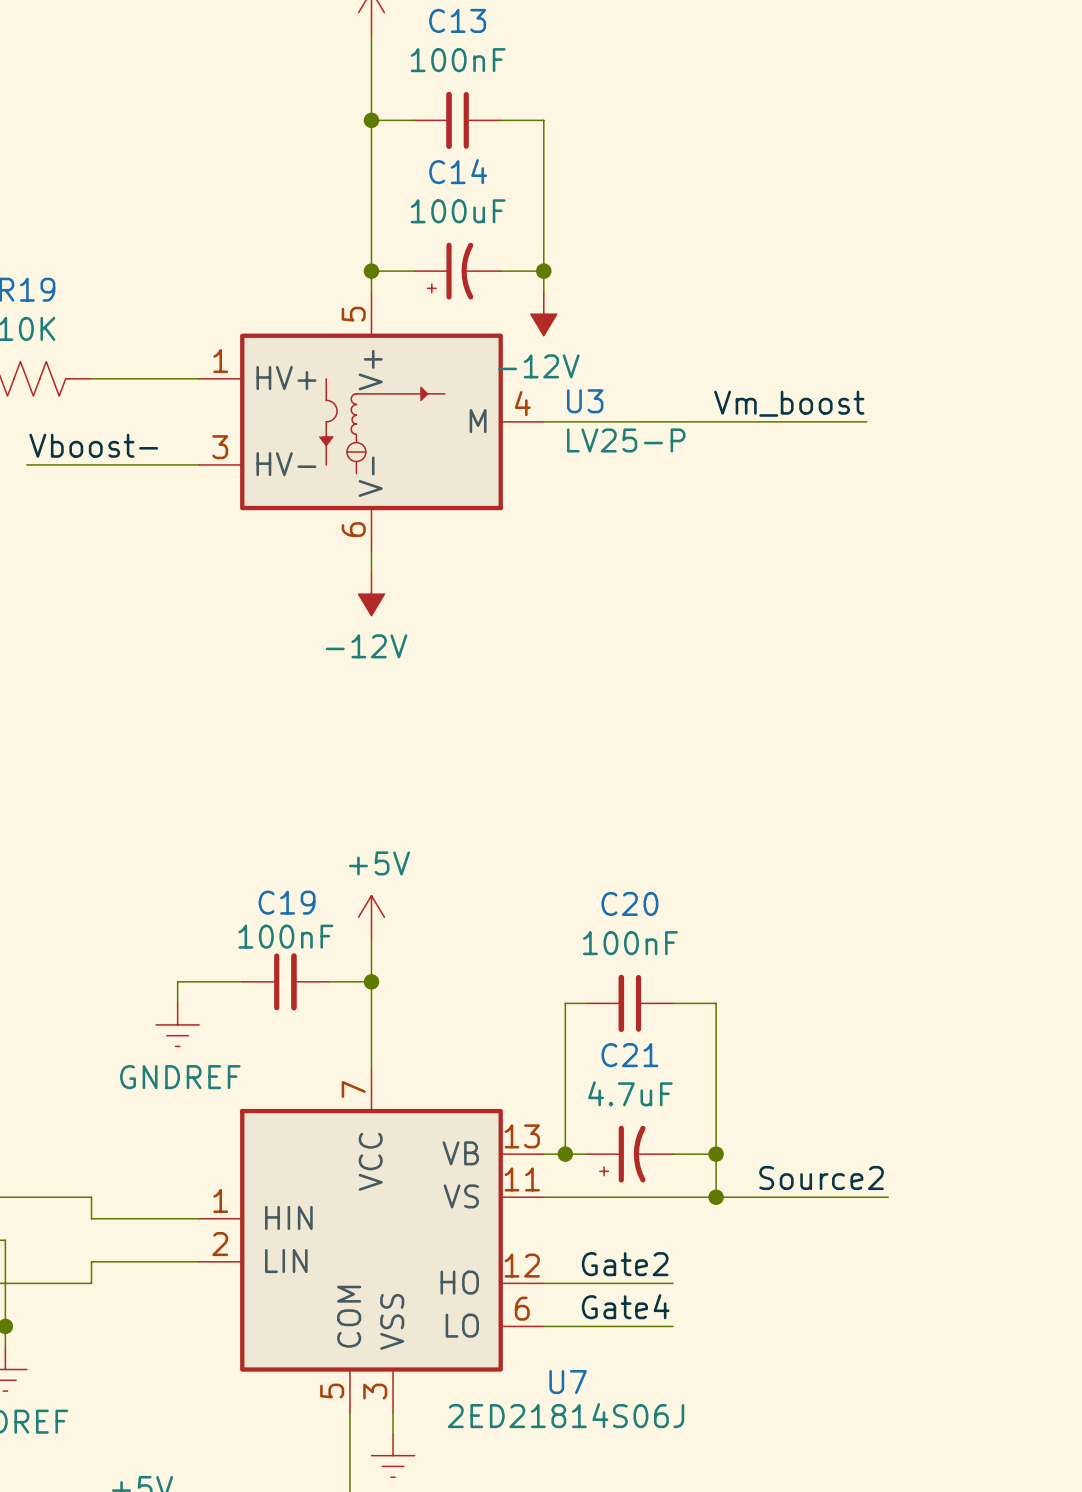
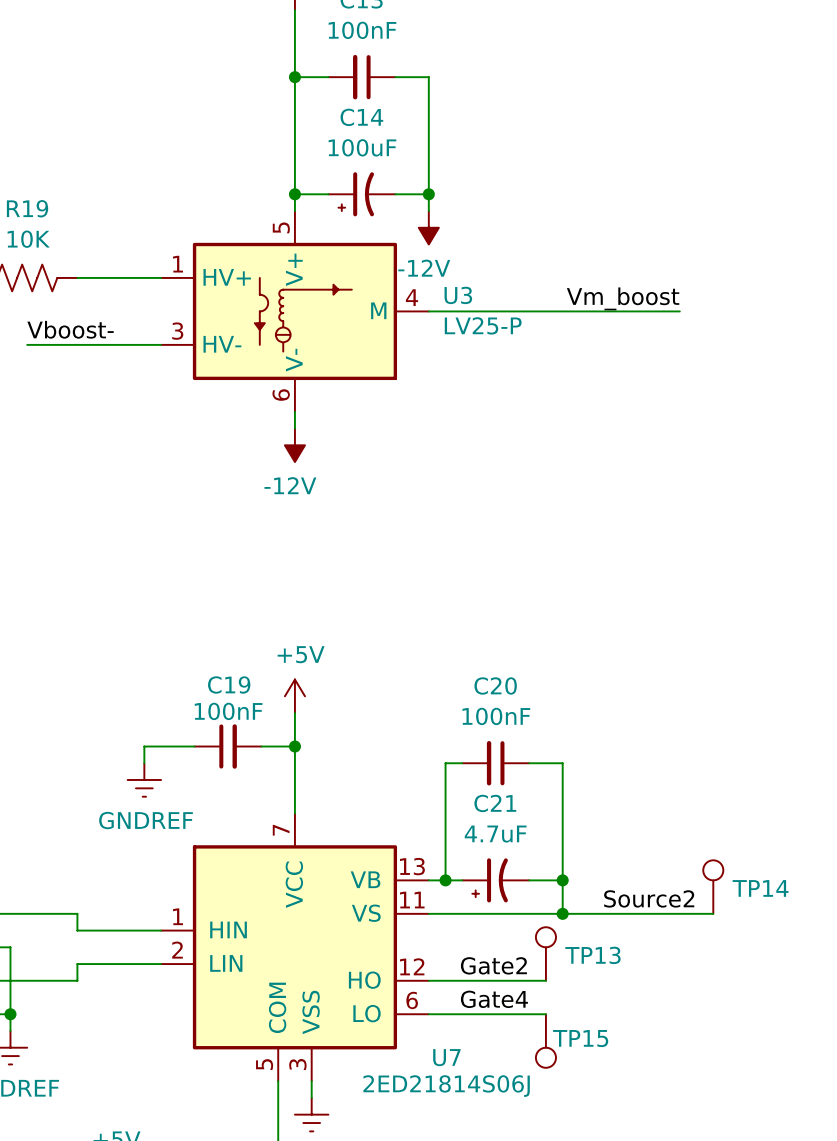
TP14: none -> (713, 887)
wire: none -> (696, 913) (713, 913)
TP13: none -> (545, 954)
wire: none -> (529, 980) (545, 980)
wire: none -> (529, 1014) (545, 1014)
TP15: none -> (545, 1041)

